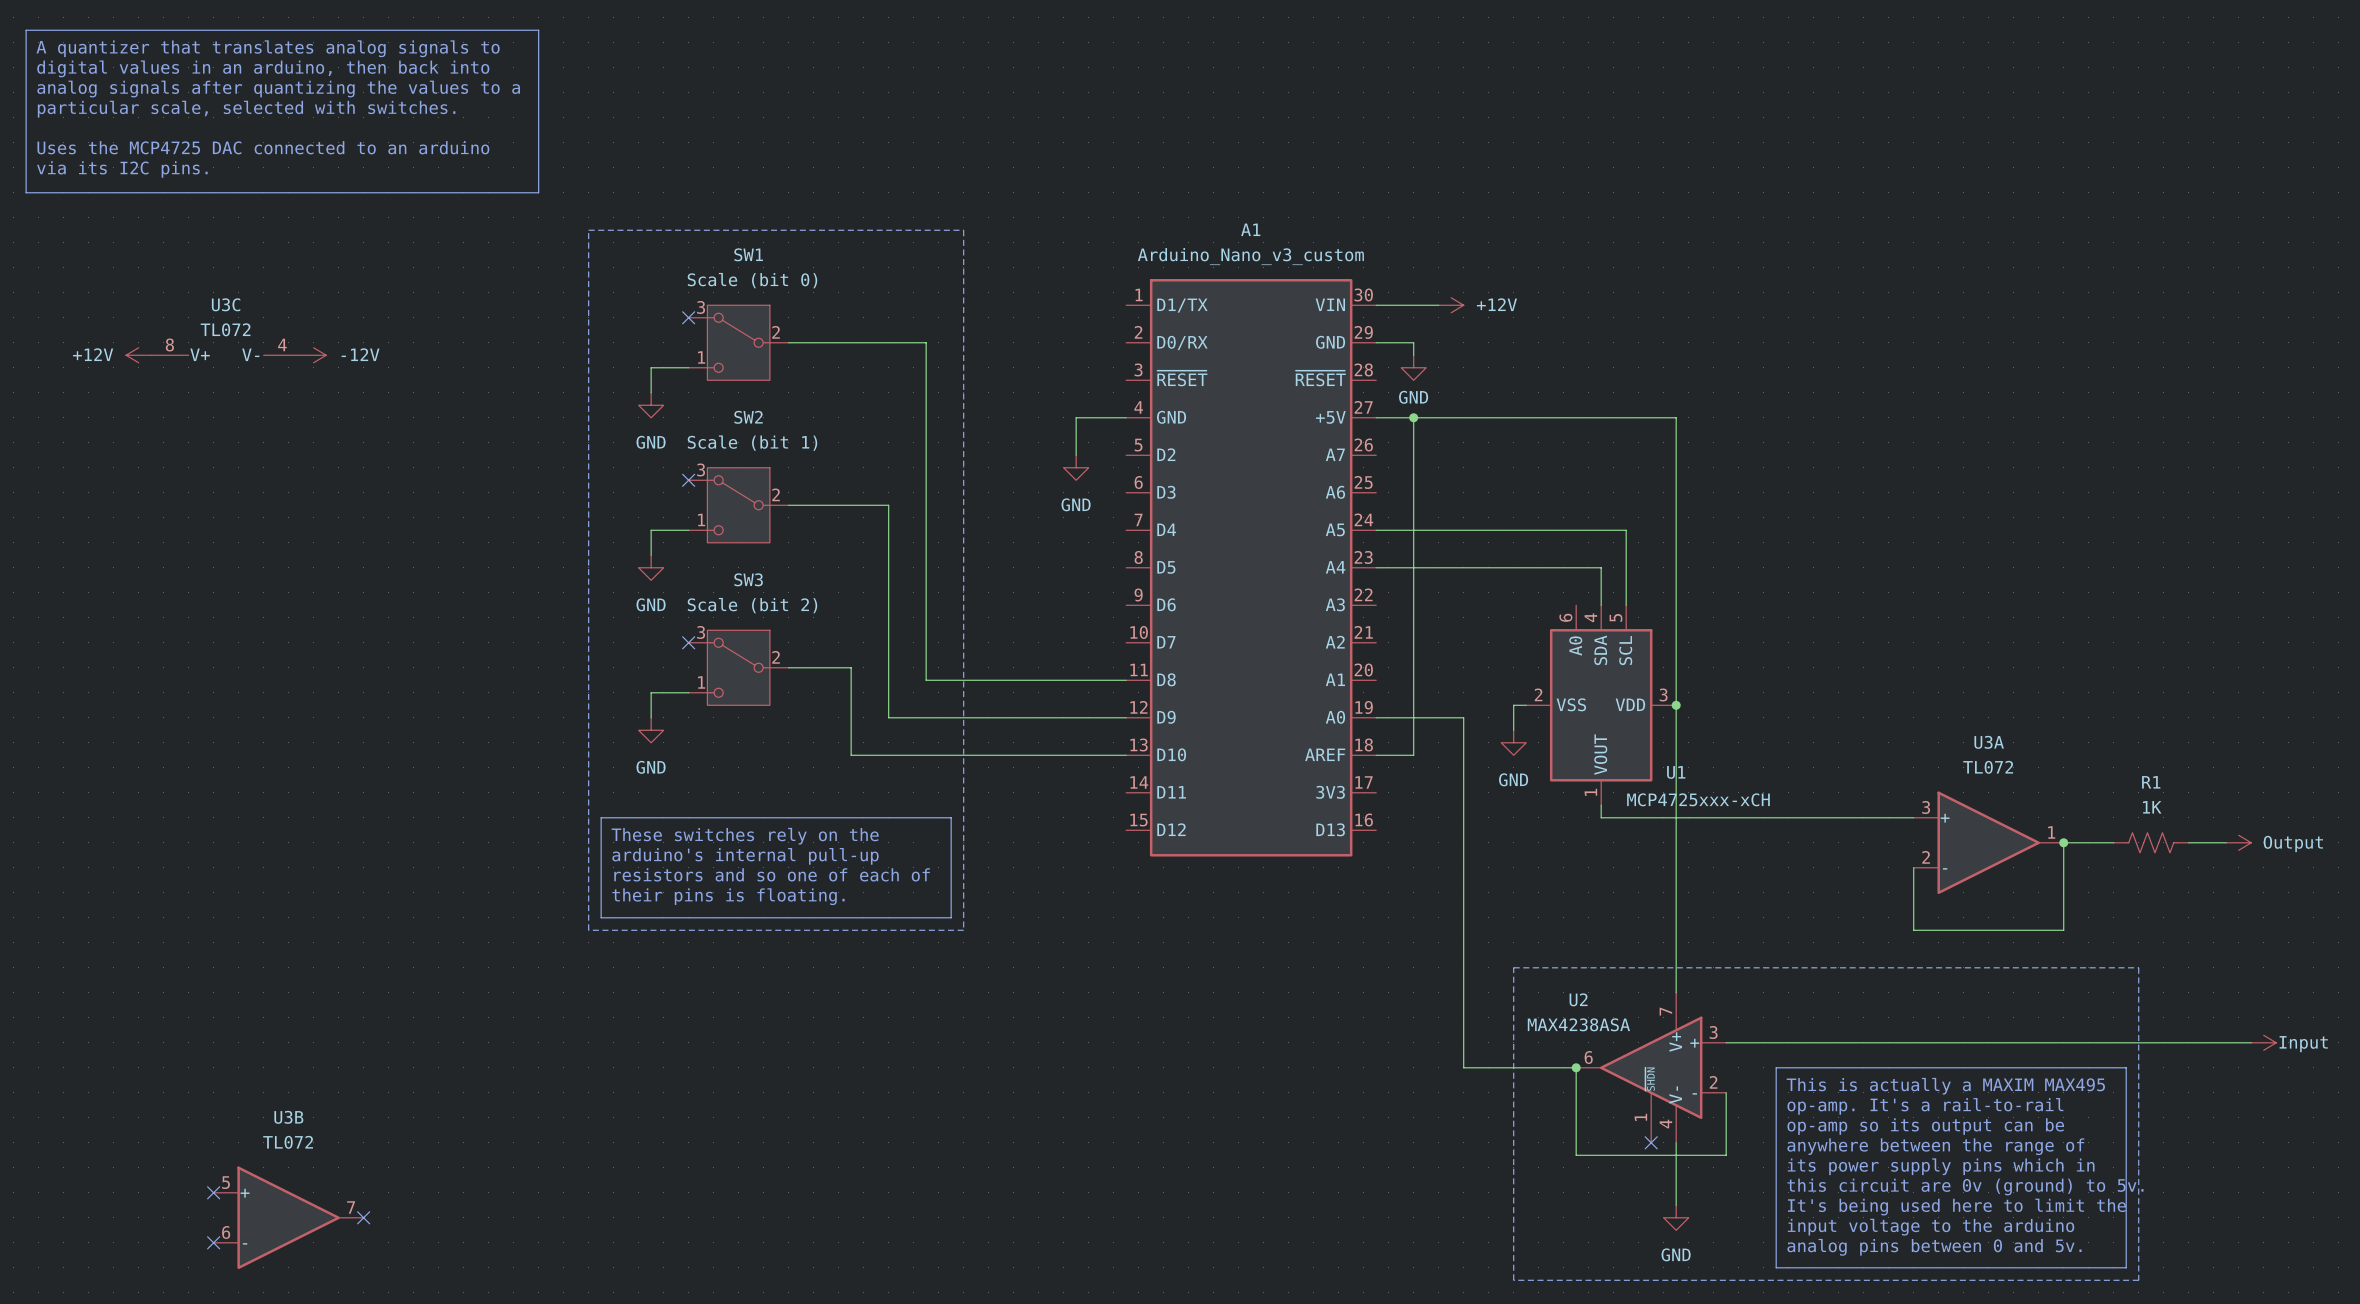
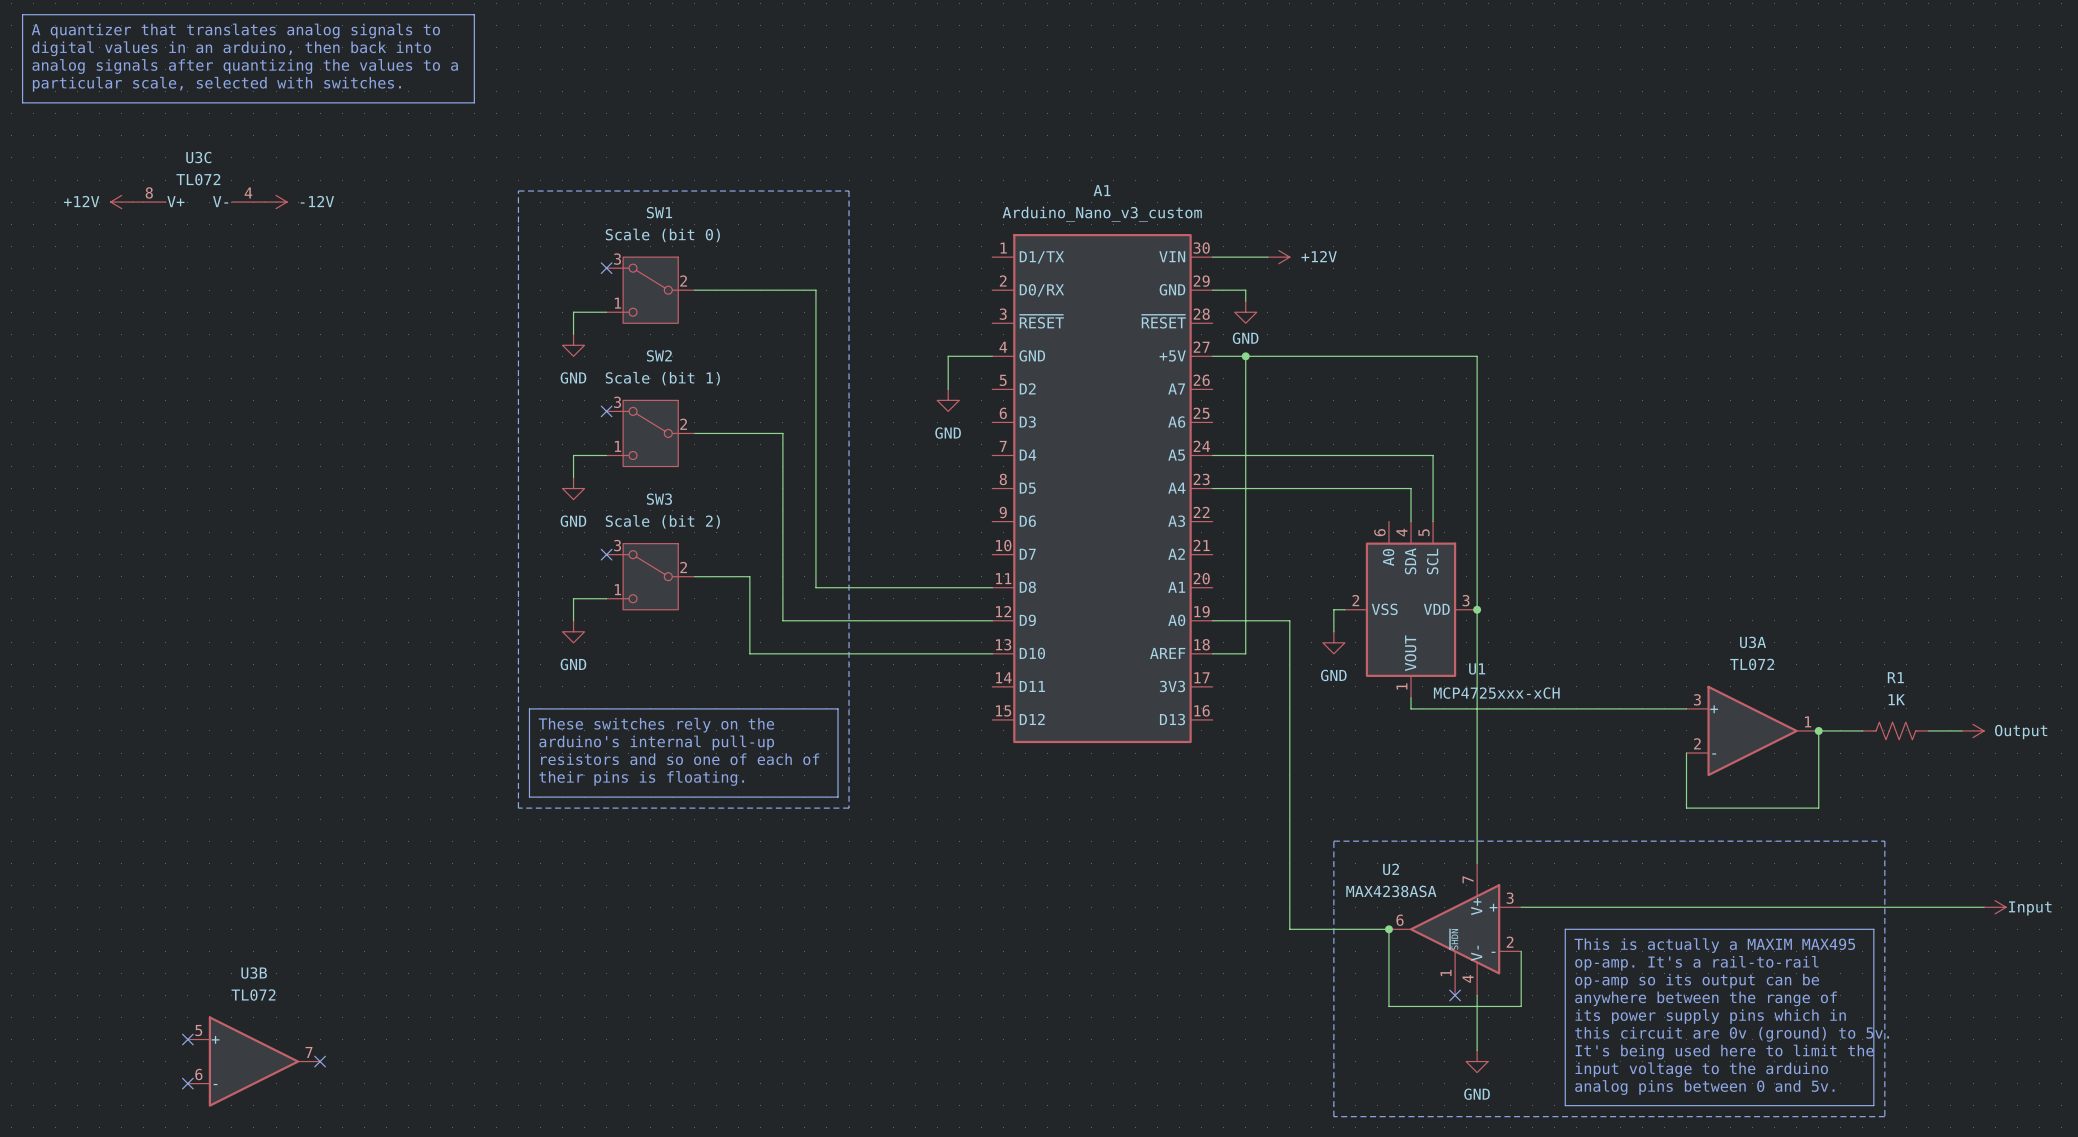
line: (26, 130) (26, 192) (538, 192) (538, 130) -> (22, 102) (474, 102)
text: Uses the MCP4725 DAC connected to an arduino (263, 147) -> none
text: via its I2C pins. (122, 169) -> none
power symbol position: +12V (138, 355) -> +12V (121, 202)
U3C position: (226, 355) -> (198, 202)
power symbol position: -12V (313, 355) -> -12V (276, 202)

